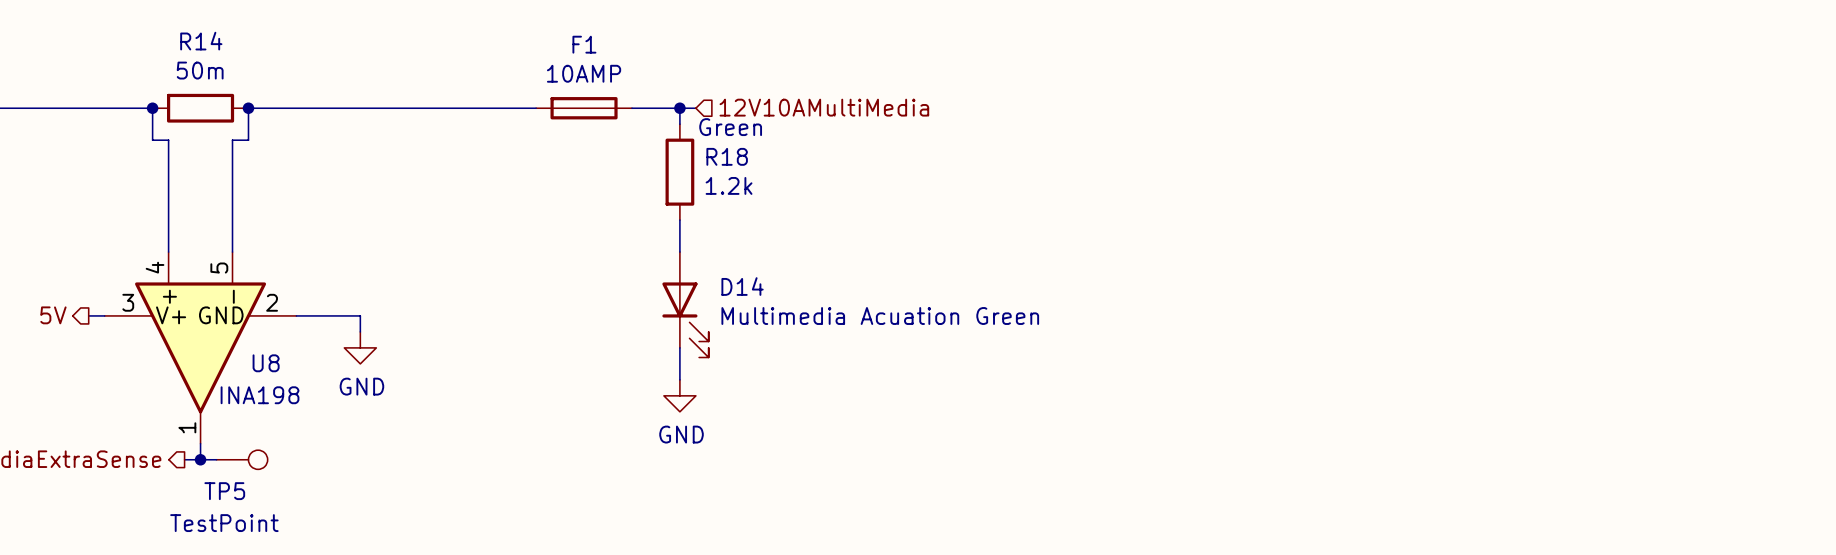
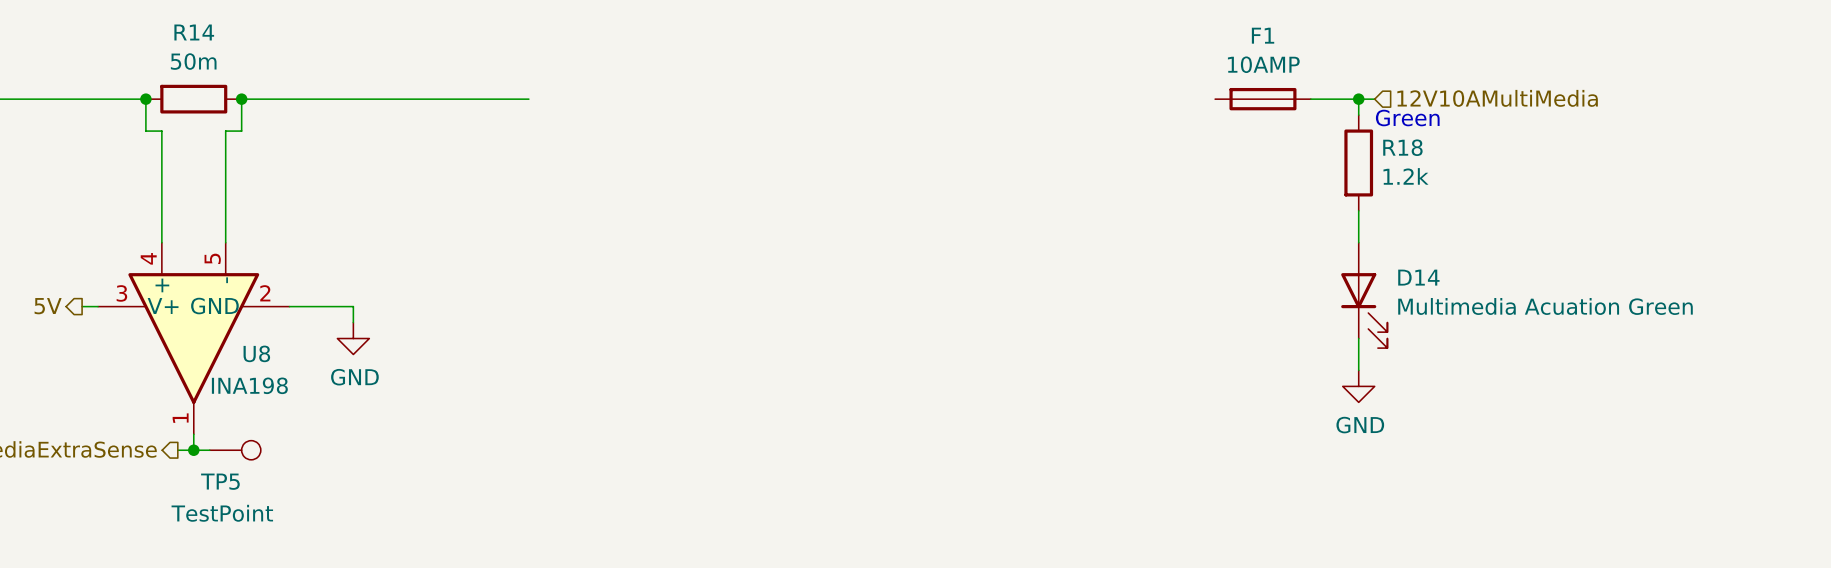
hierarchical label: 12V10AMultiMedia (824, 107) -> none
hierarchical label: none -> 12V10AMultiMedia (1497, 98)
F1 position: (584, 108) -> (1262, 99)
wire: (631, 108) (695, 108) -> none
wire: (679, 108) (679, 124) -> none
junction: (679, 108) -> none
wire: none -> (1310, 99) (1374, 99)
wire: none -> (1358, 99) (1358, 115)
junction: none -> (1358, 99)
text: Green (730, 127) -> none
text: none -> Green (1407, 118)
R18 position: (679, 172) -> (1358, 162)
wire: (679, 220) (679, 252) -> none
wire: none -> (1358, 210) (1358, 242)
D14 position: (685, 304) -> (1364, 295)
wire: (679, 347) (679, 379) -> none
wire: none -> (1358, 338) (1358, 370)
power symbol: GND (679, 395) -> none
power symbol: none -> GND (1358, 386)

